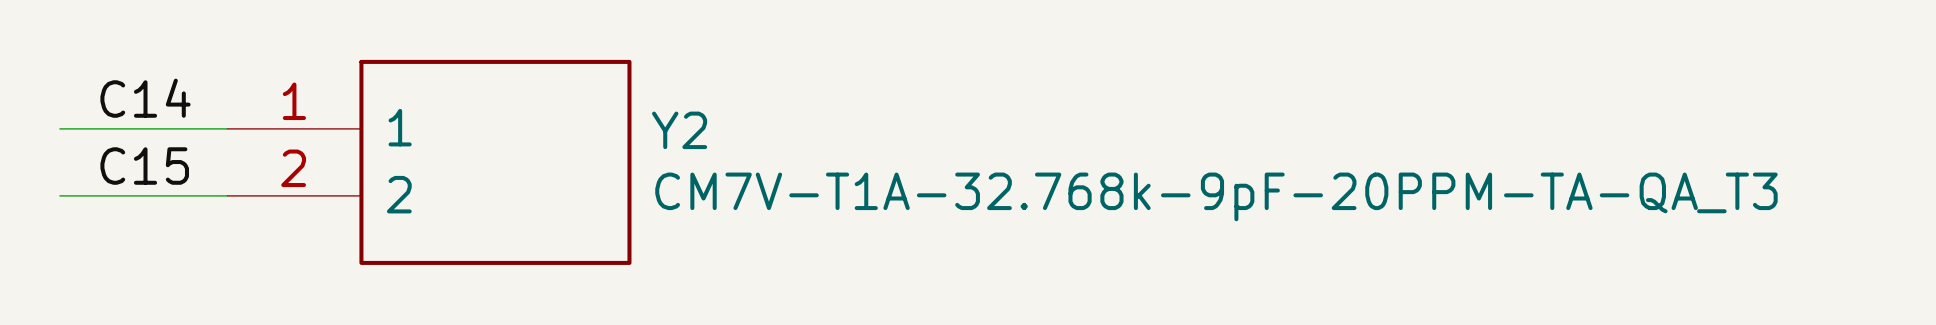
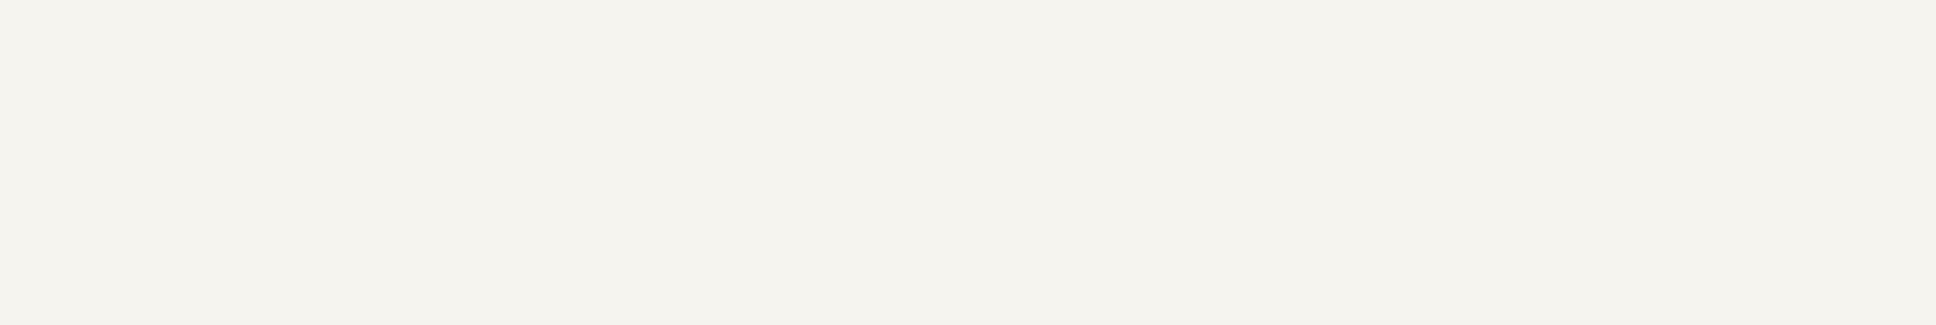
label: C14 (145, 98) -> none
wire: (59, 128) (227, 128) -> none
Y2: CM7V-T1A-32.768k-9pF-20PPM-TA-QA_T3 (429, 162) -> none
label: C15 (144, 166) -> none
wire: (59, 195) (227, 195) -> none

